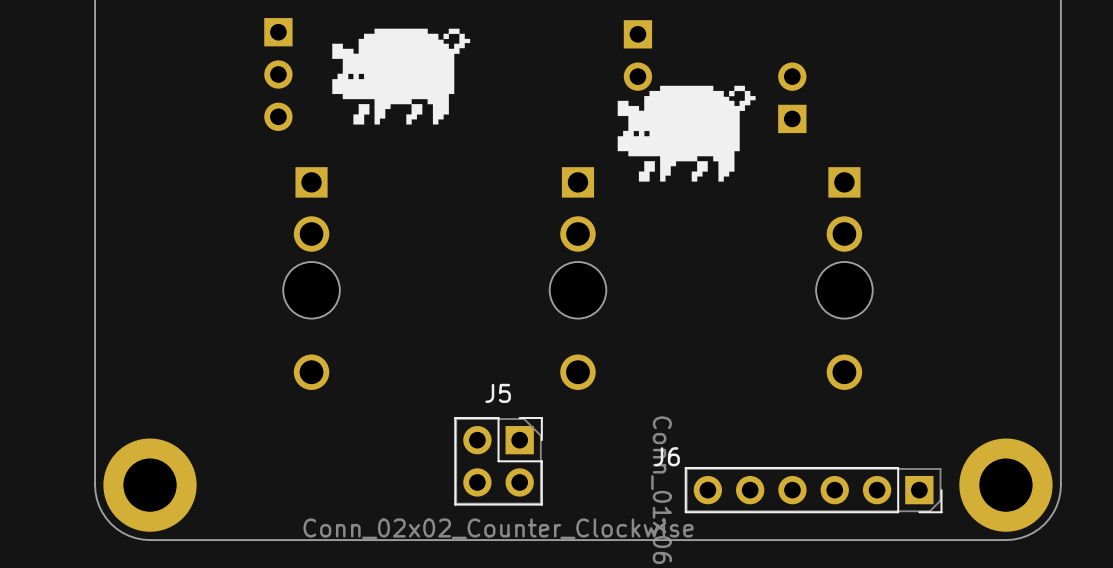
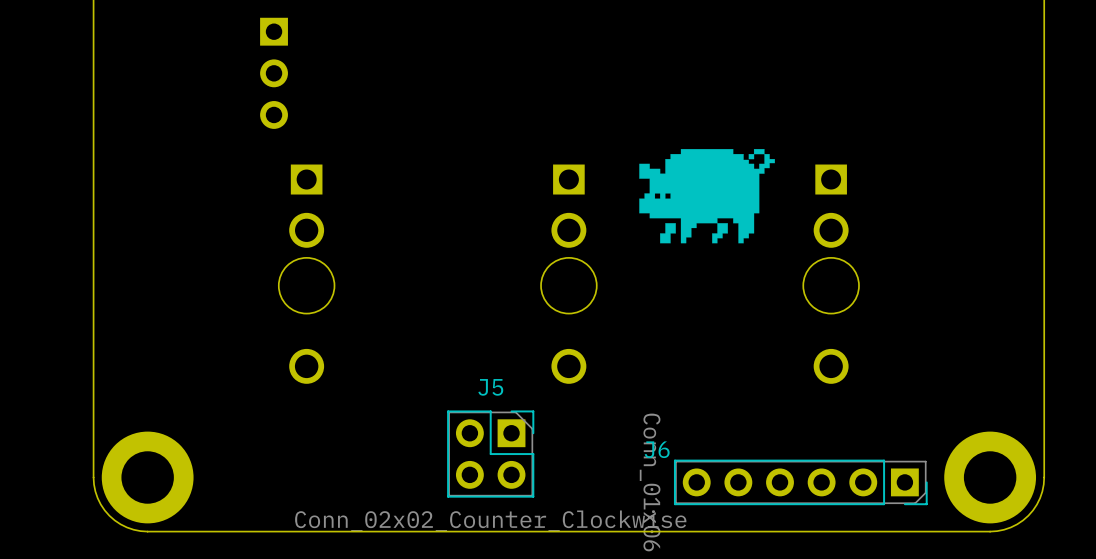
drawing: [332, 28, 471, 125] -> none
part: (637, 55) -> none
part: (792, 97) -> none
drawing position: (686, 133) -> (707, 196)

